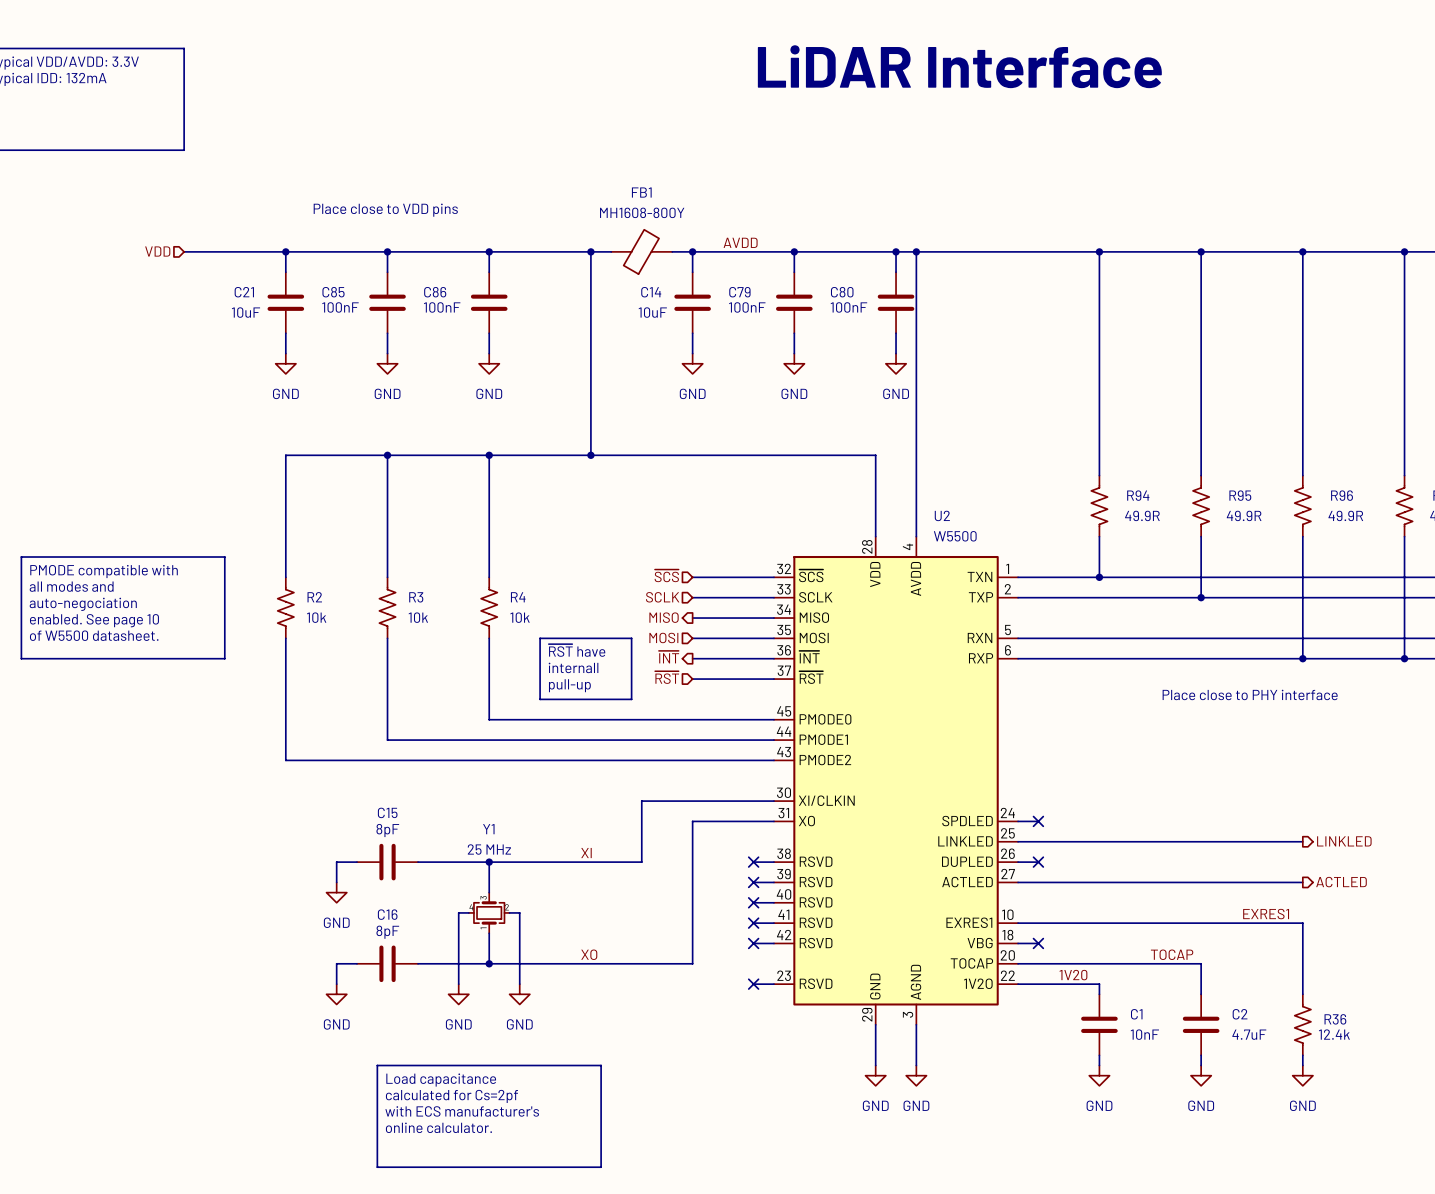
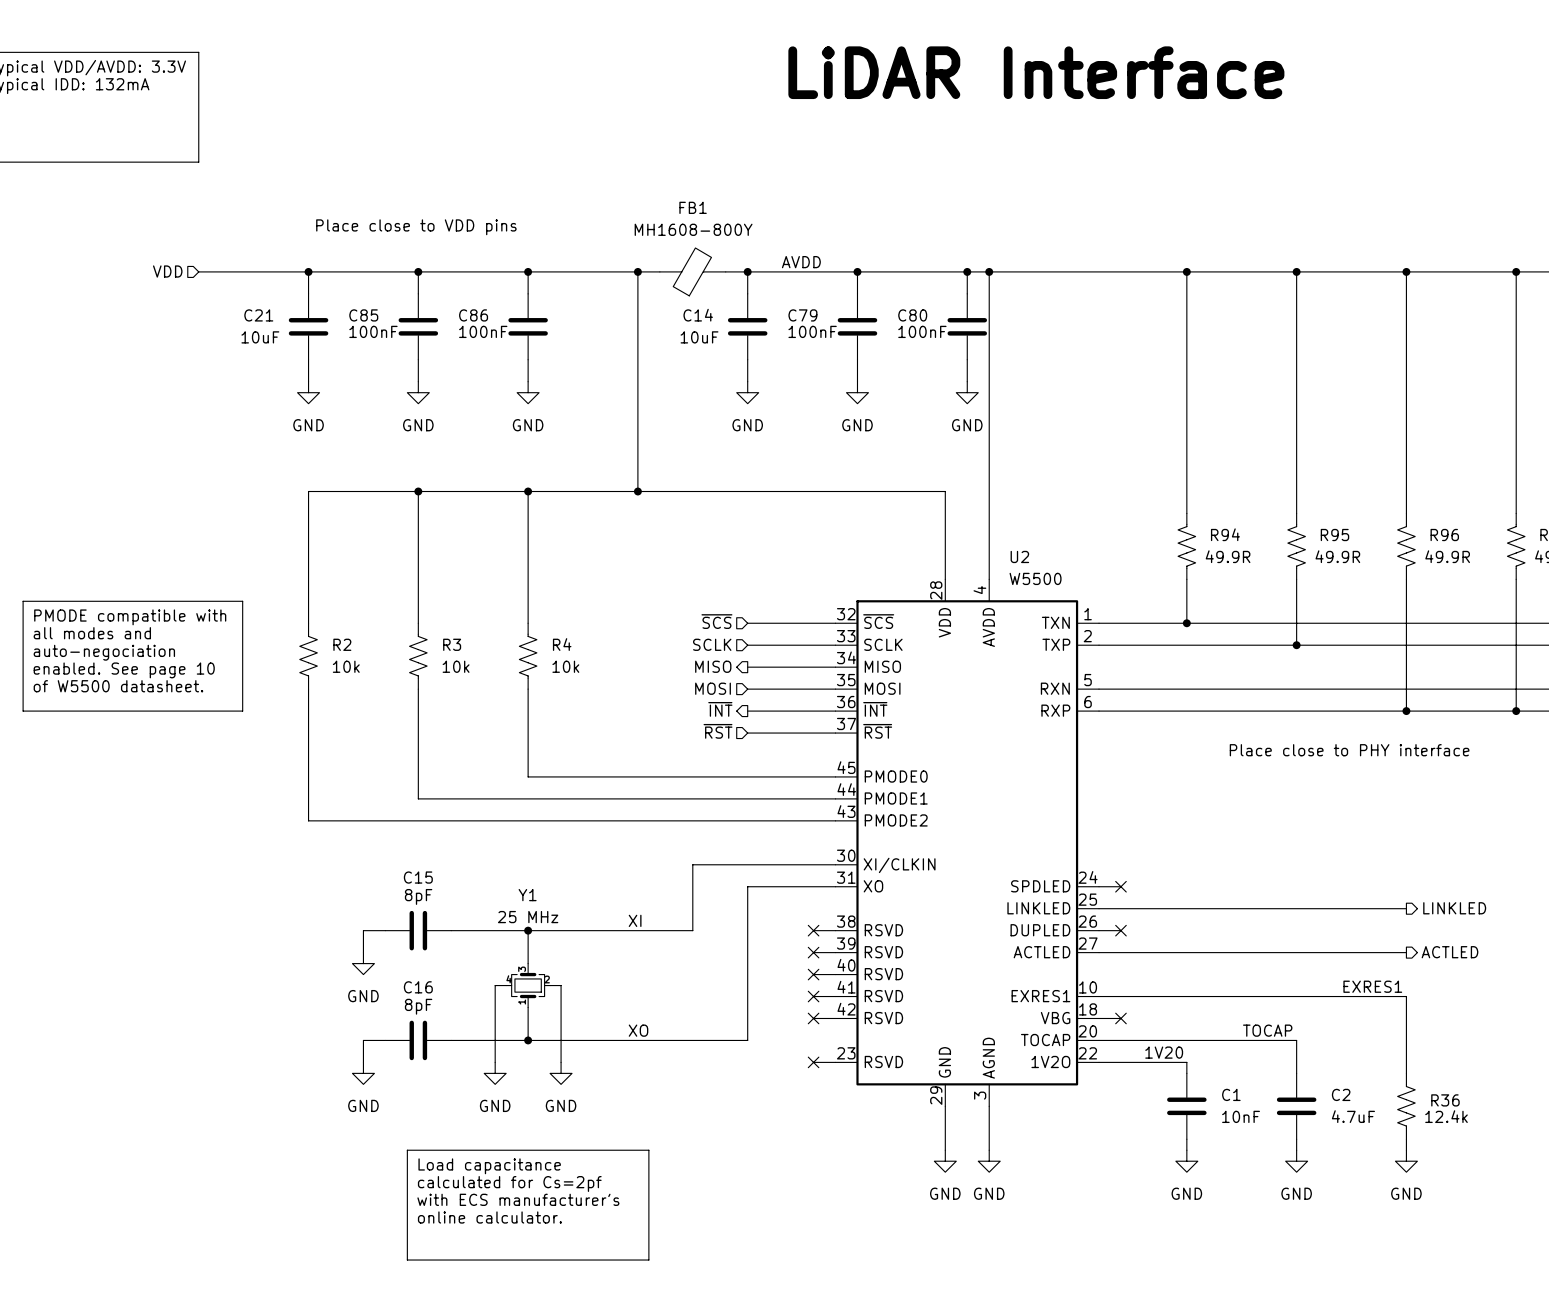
line: (540, 638) (631, 638) (631, 699) (540, 699) (540, 638) -> none
text: ~{RST} have (576, 650) -> none
text: internall (573, 667) -> none
text: pull-up (569, 685) -> none

